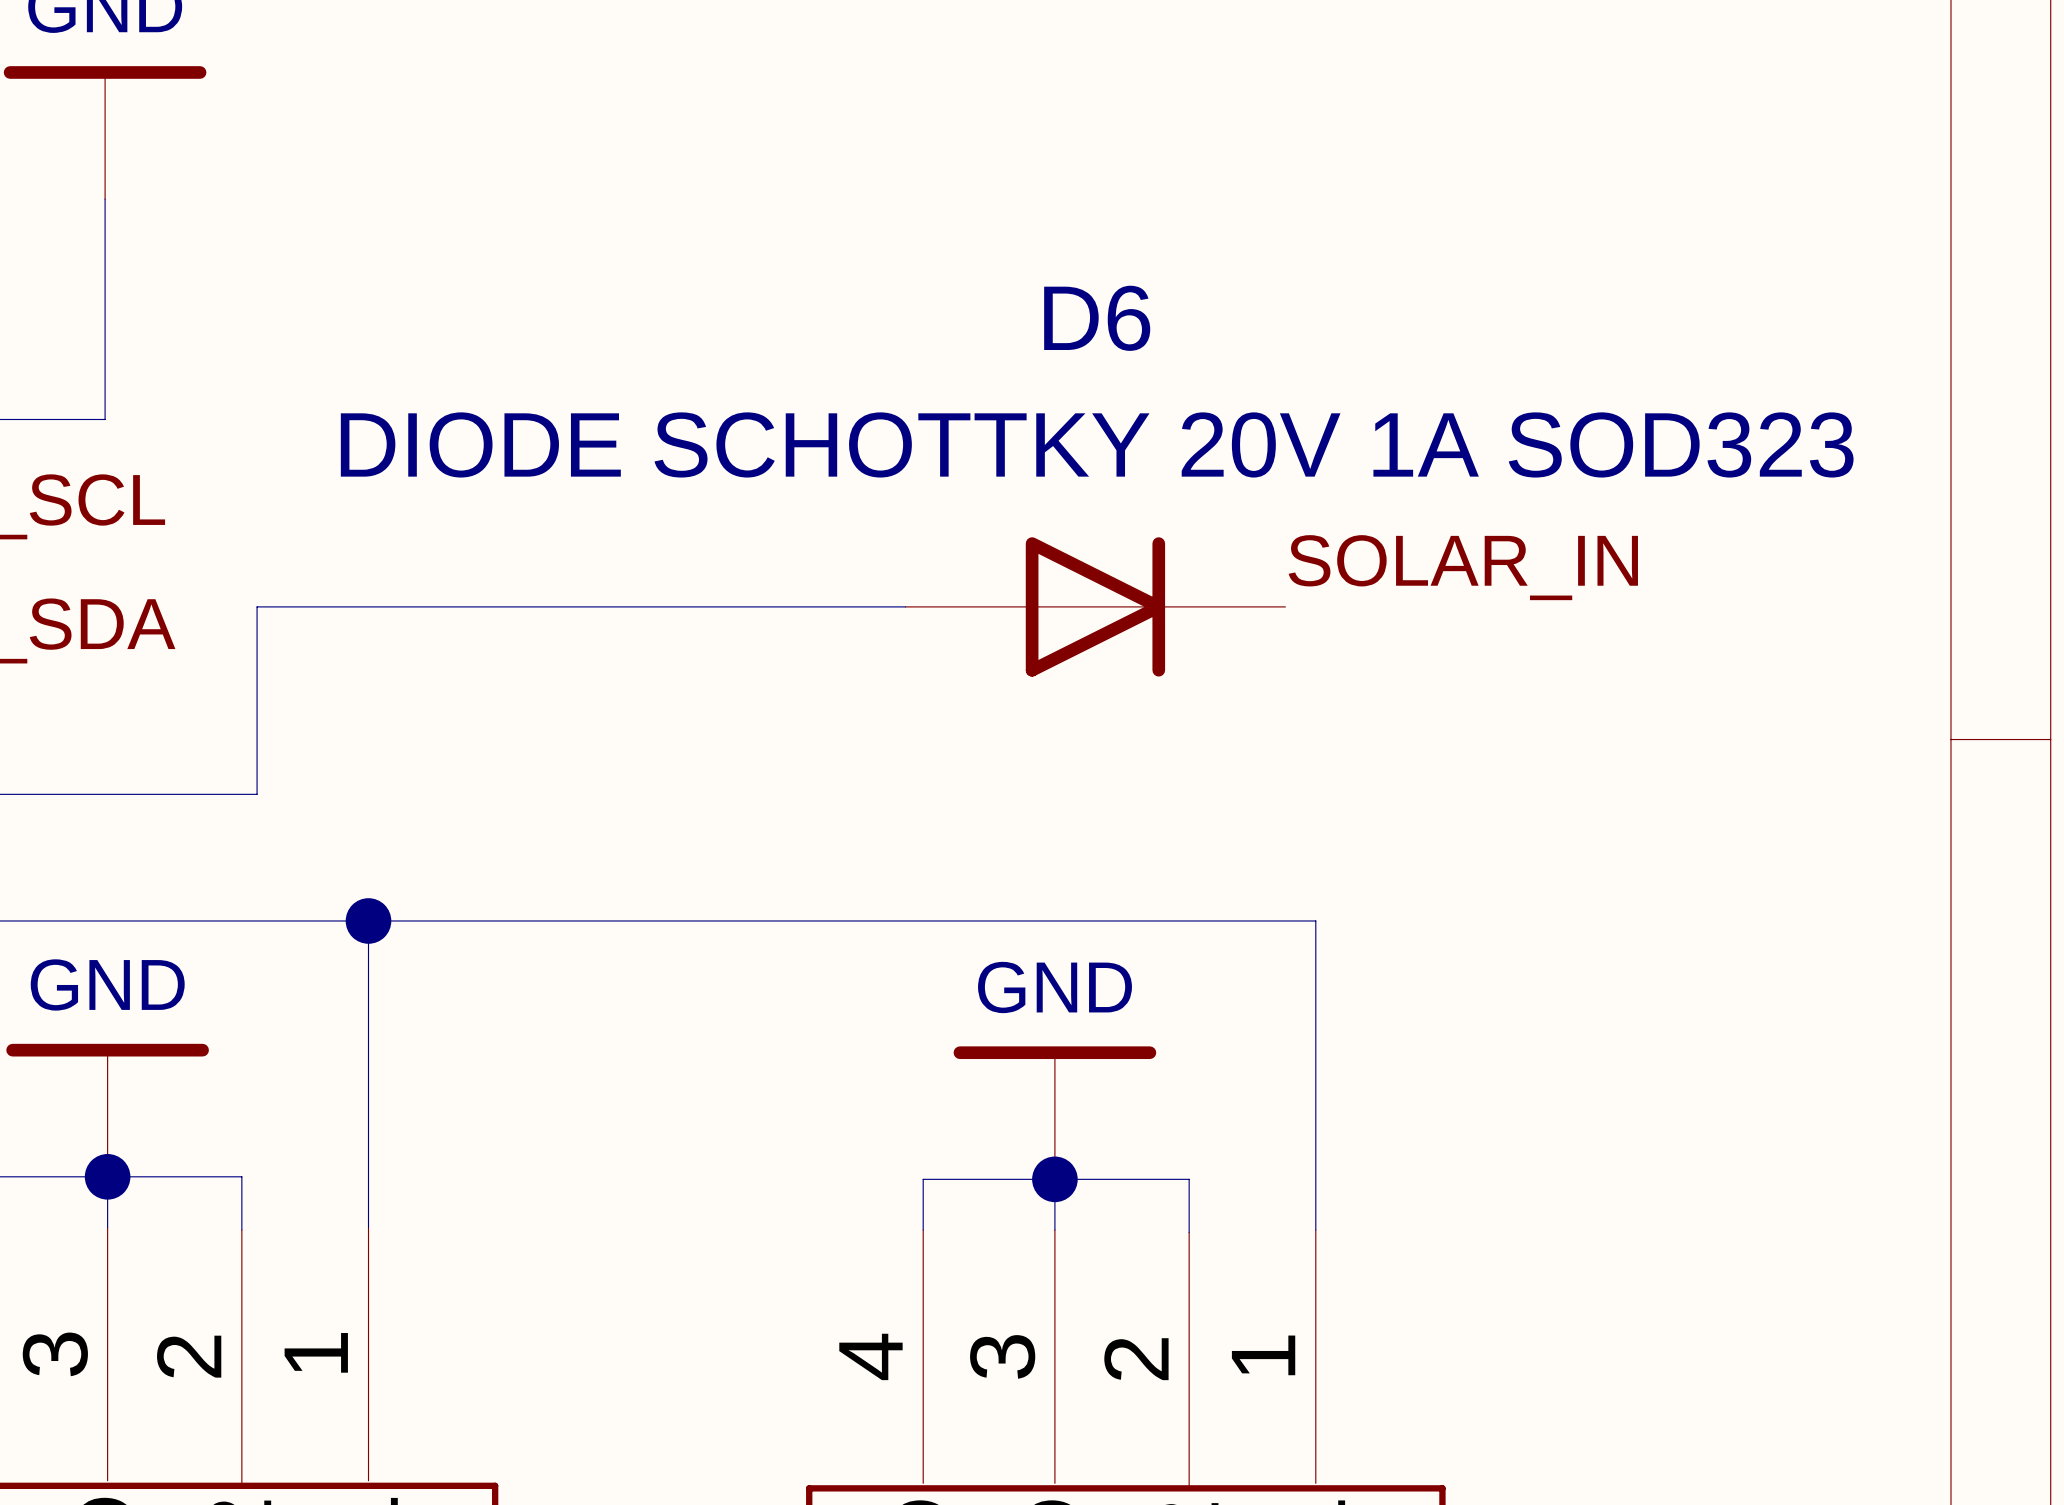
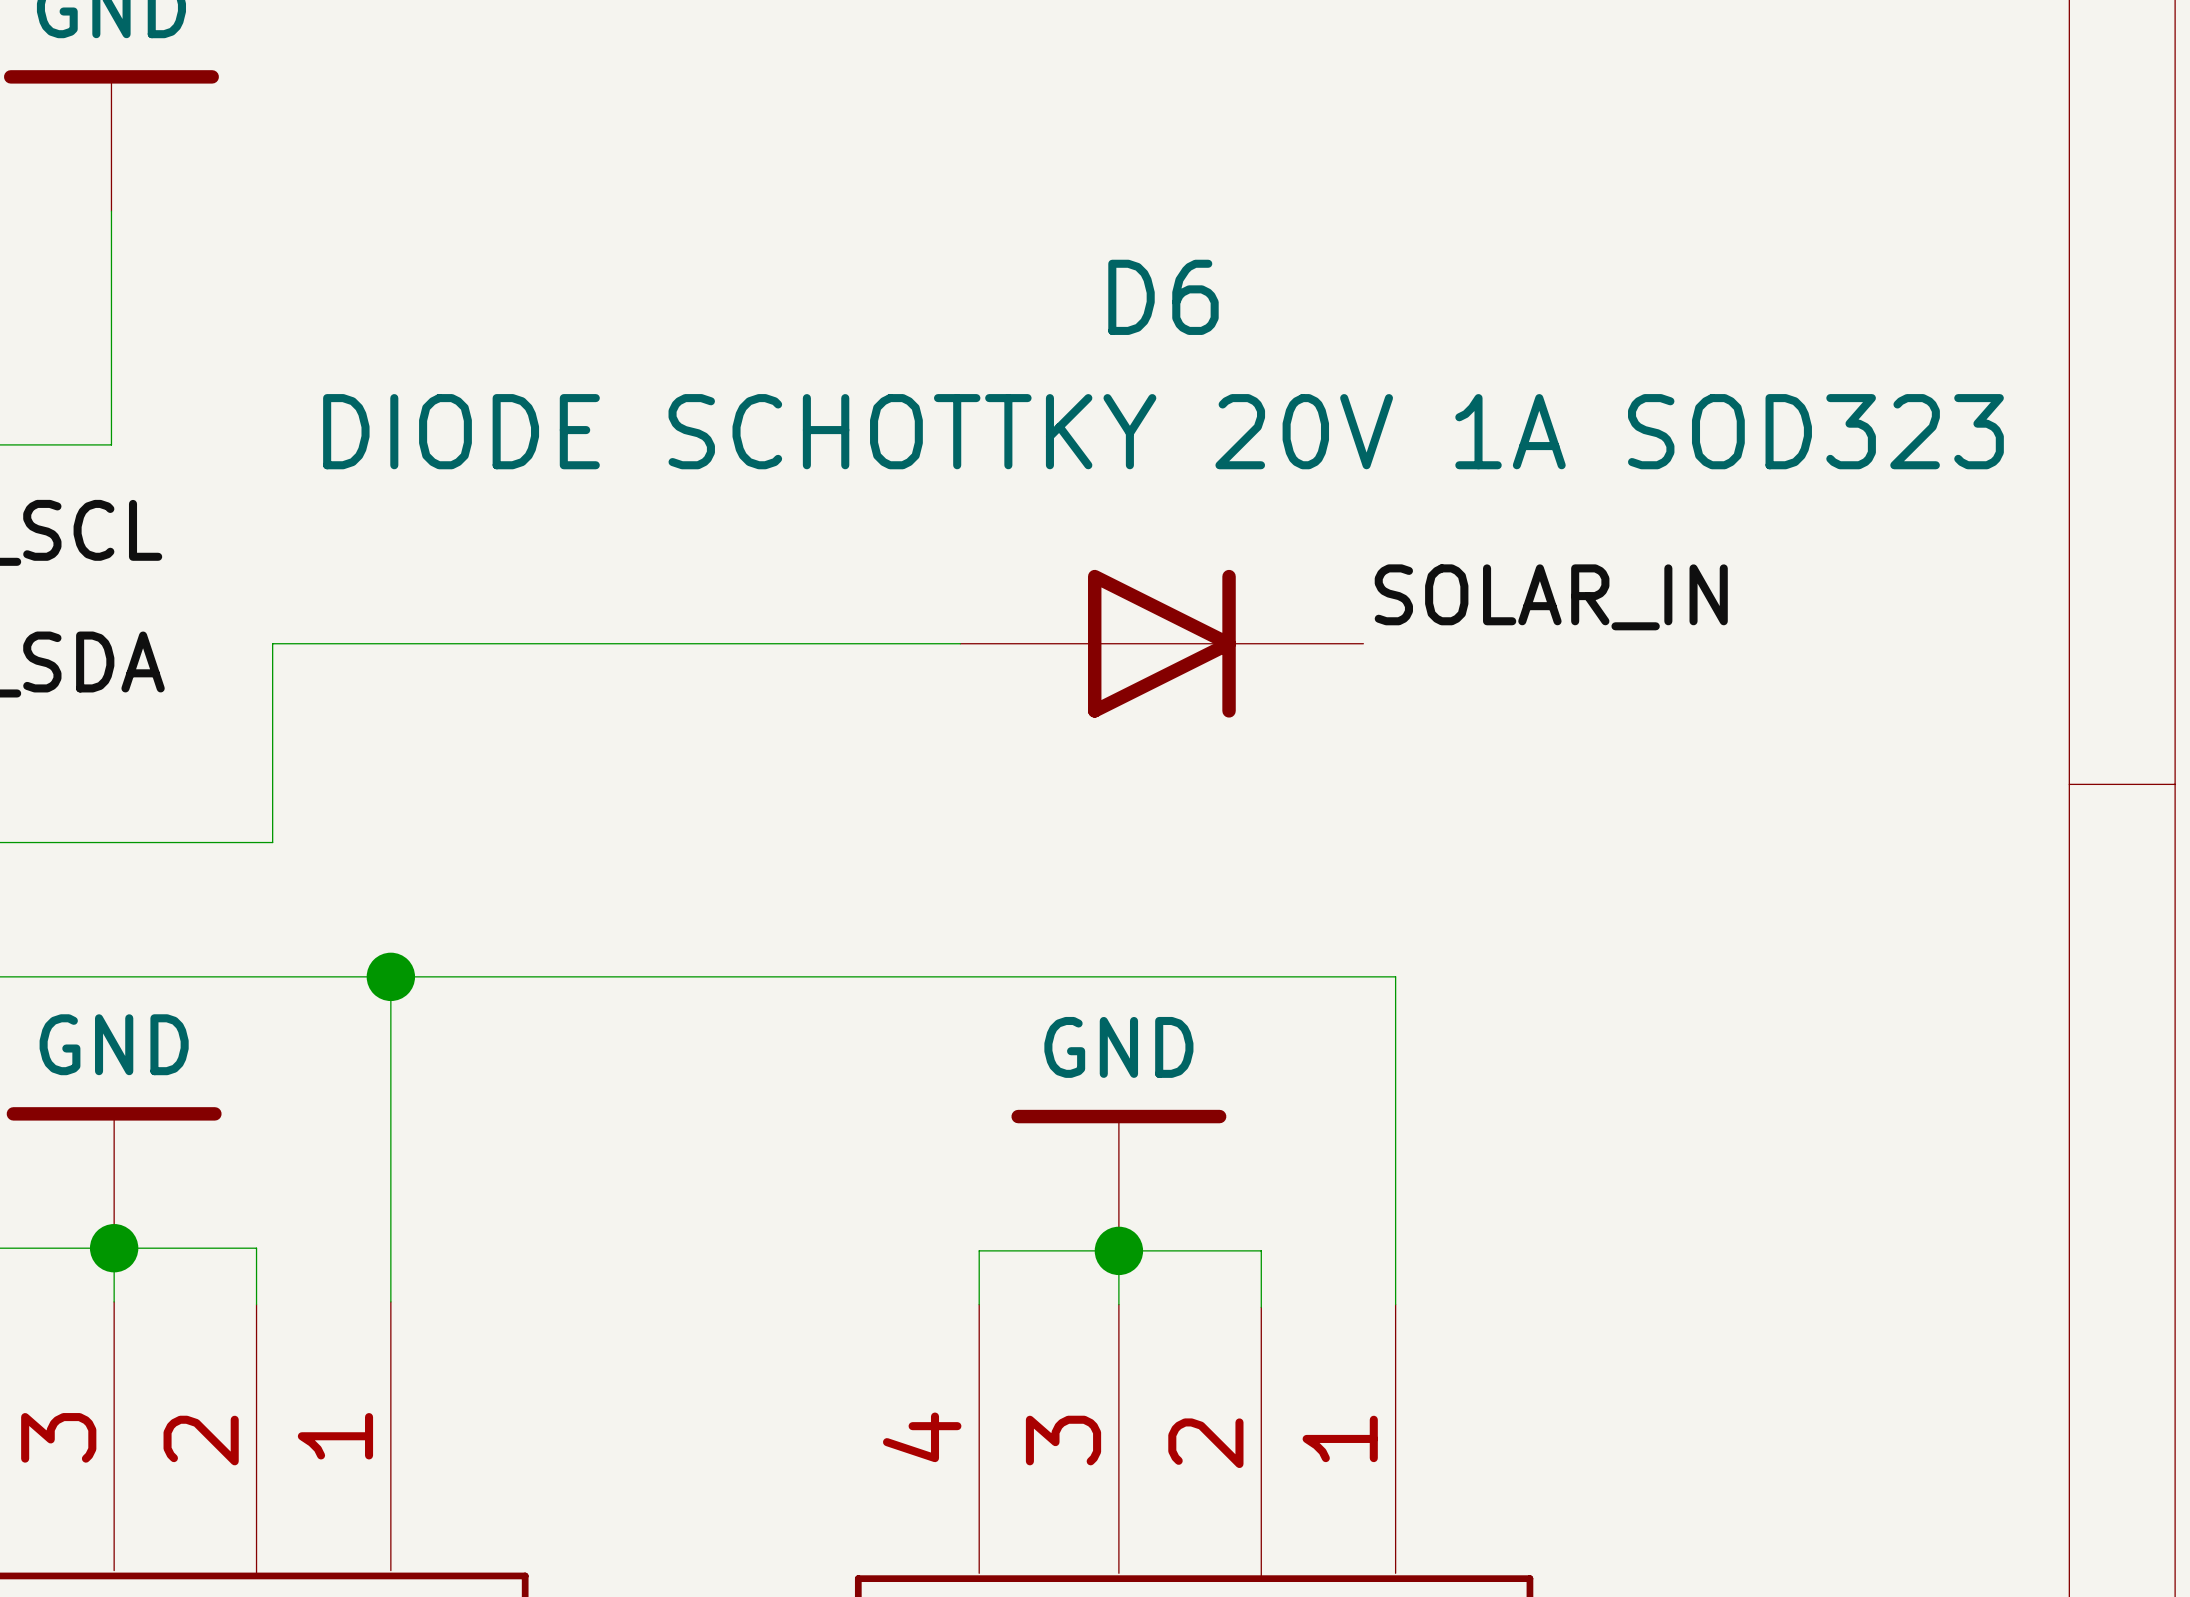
D6 name position: D6 (1097, 318) -> D6 (1163, 297)
D6 value position: DIODE SCHOTTKY 20V 1A SOD323 (1097, 444) -> DIODE SCHOTTKY 20V 1A SOD323 (1163, 431)

